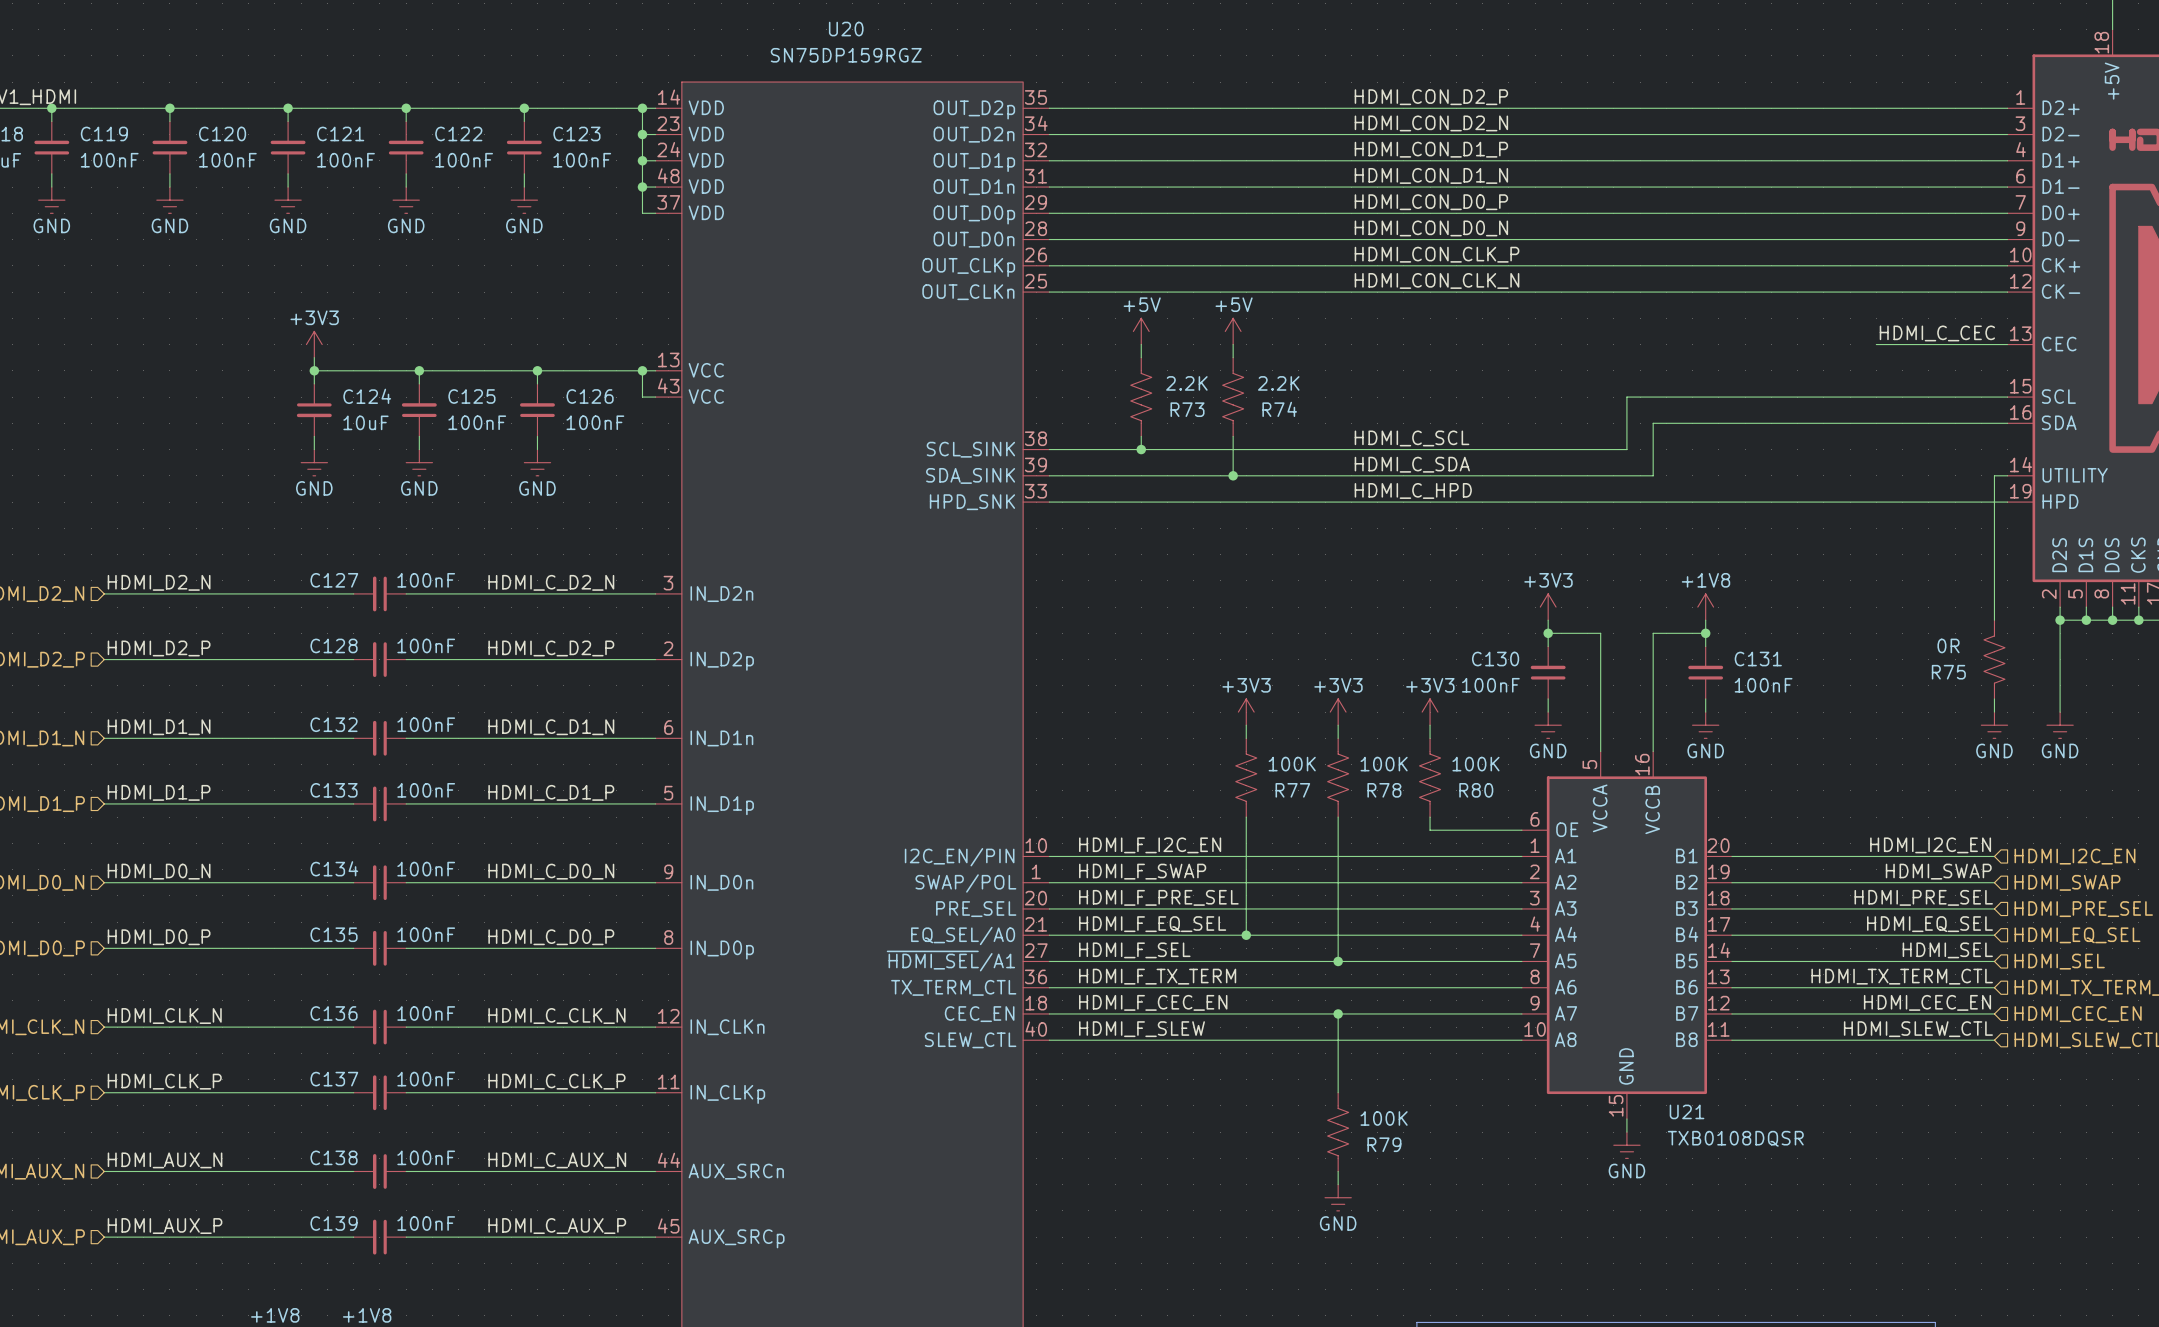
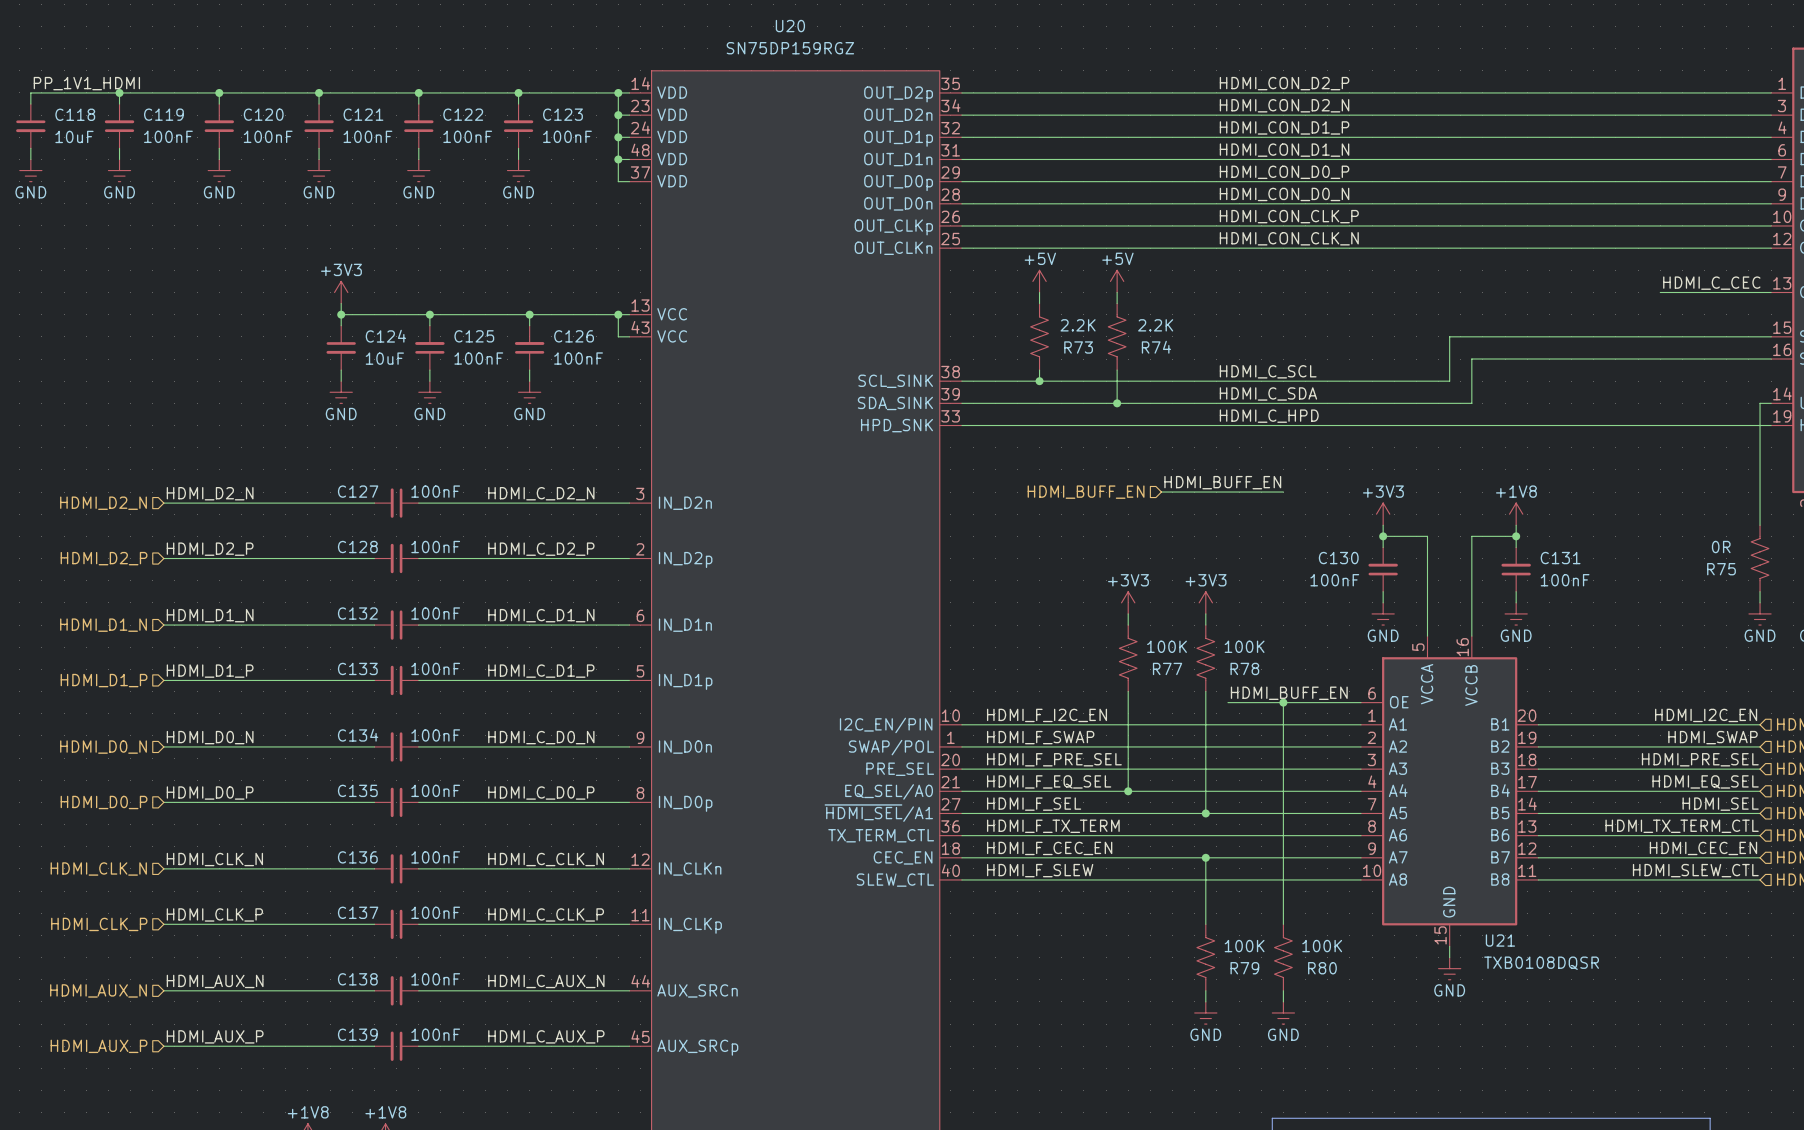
label: none -> HDMI_BUFF_EN (1222, 482)
hierarchical label: none -> HDMI_BUFF_EN (1086, 492)
wire: none -> (1161, 492) (1283, 492)
power symbol: +3V3 (1430, 712) -> none
wire: (1430, 725) (1430, 738) -> none
R80 position: (1430, 777) -> (1283, 957)
wire: (1430, 817) (1430, 830) -> none
label: none -> HDMI_BUFF_EN (1289, 693)
wire: none -> (1227, 702) (1283, 702) (1283, 924)
junction: none -> (1283, 702)
wire: none -> (1283, 990) (1283, 1001)
power symbol: none -> GND (1283, 1012)

